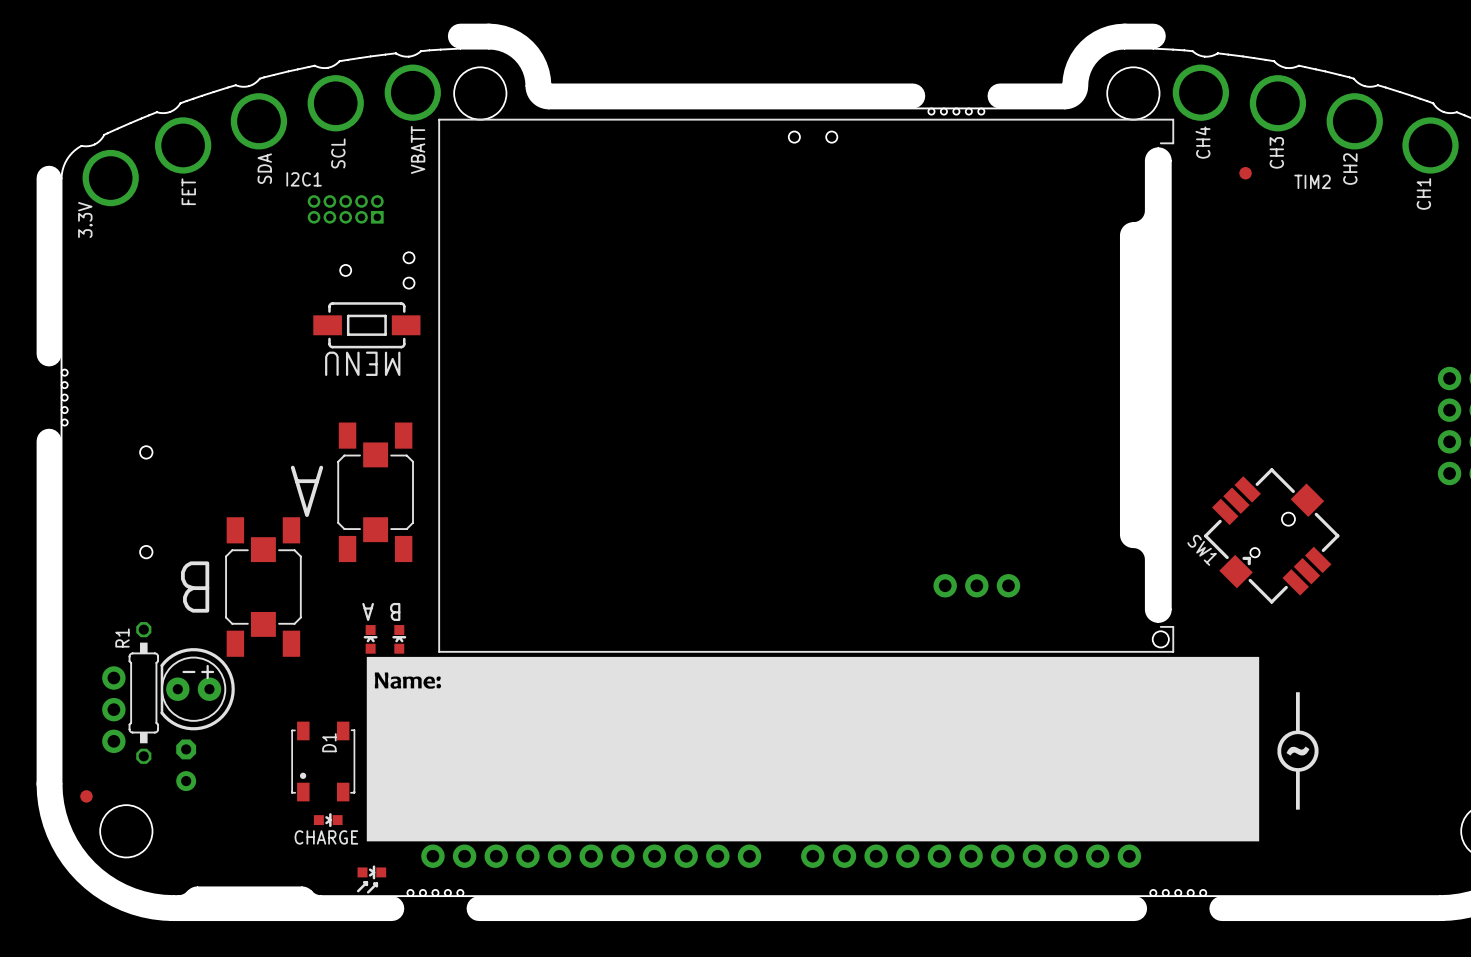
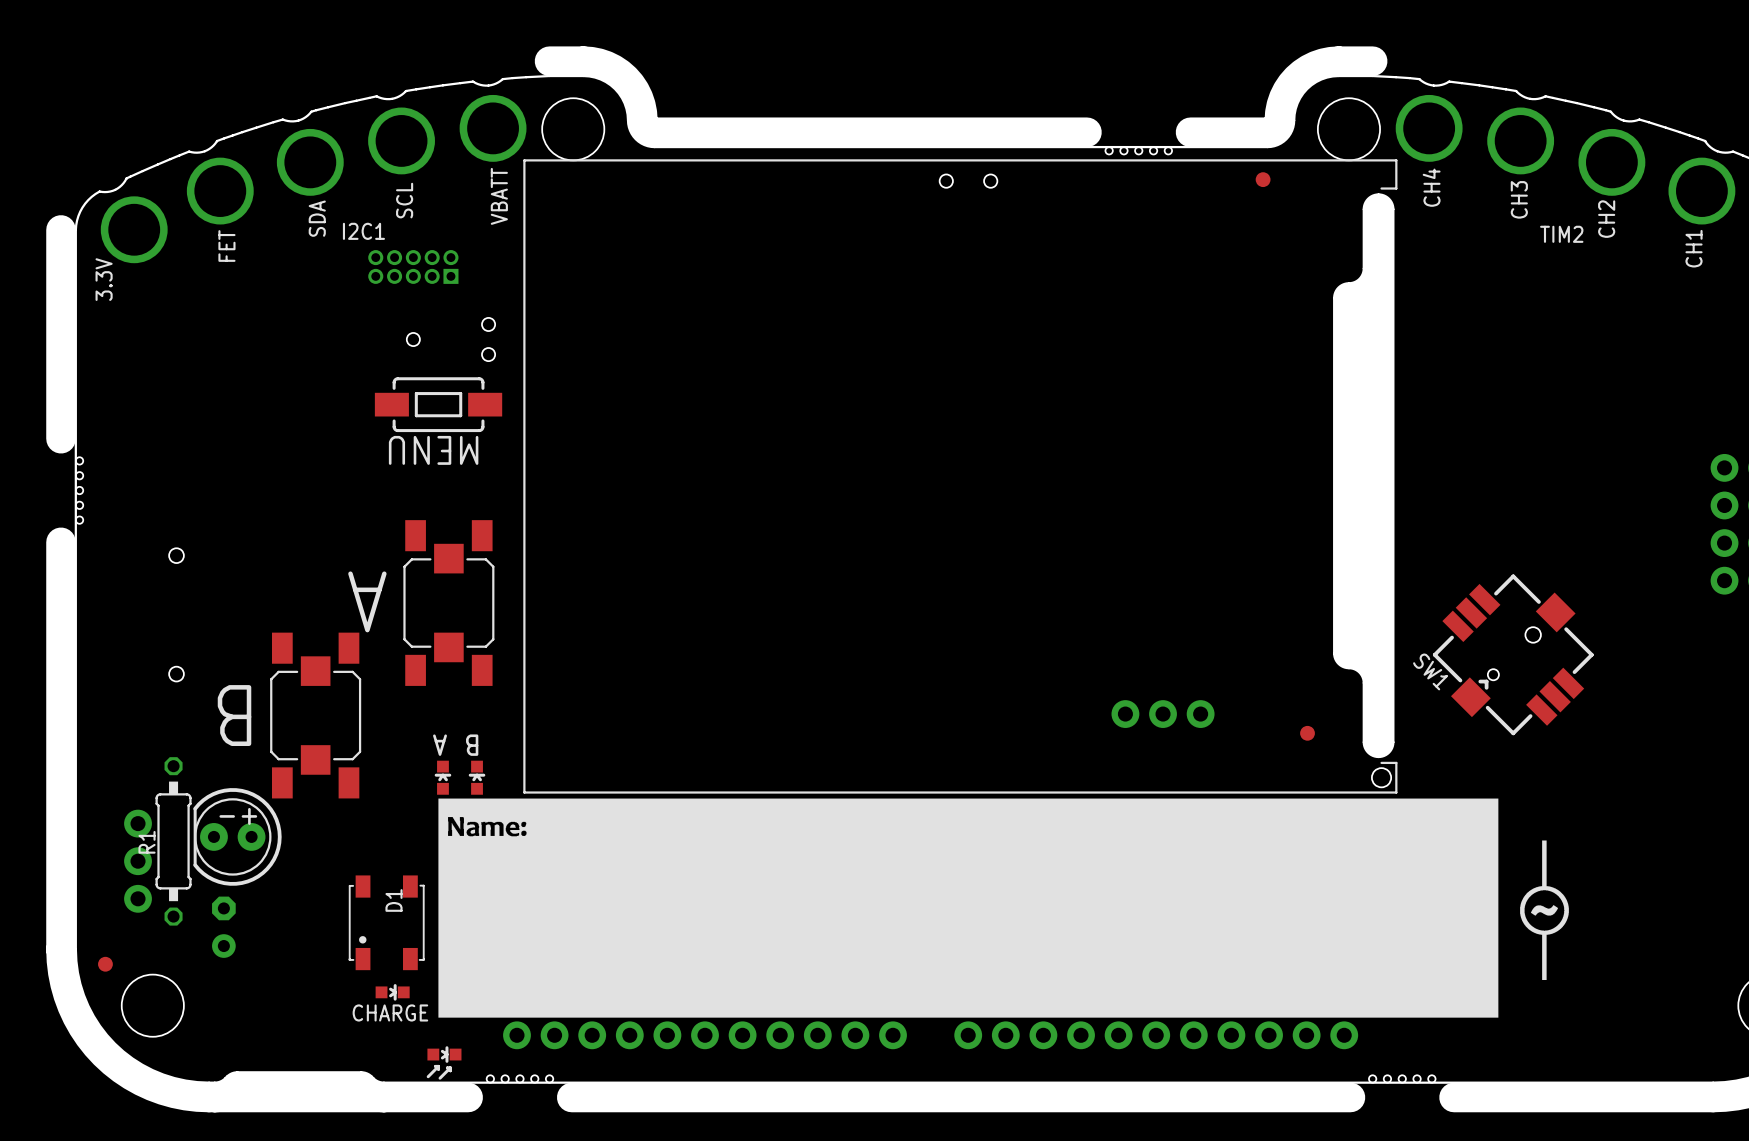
part position: (1245, 173) -> (1263, 179)
part: none -> (1307, 733)
R1 name position: R1 (122, 638) -> R1 (147, 842)

